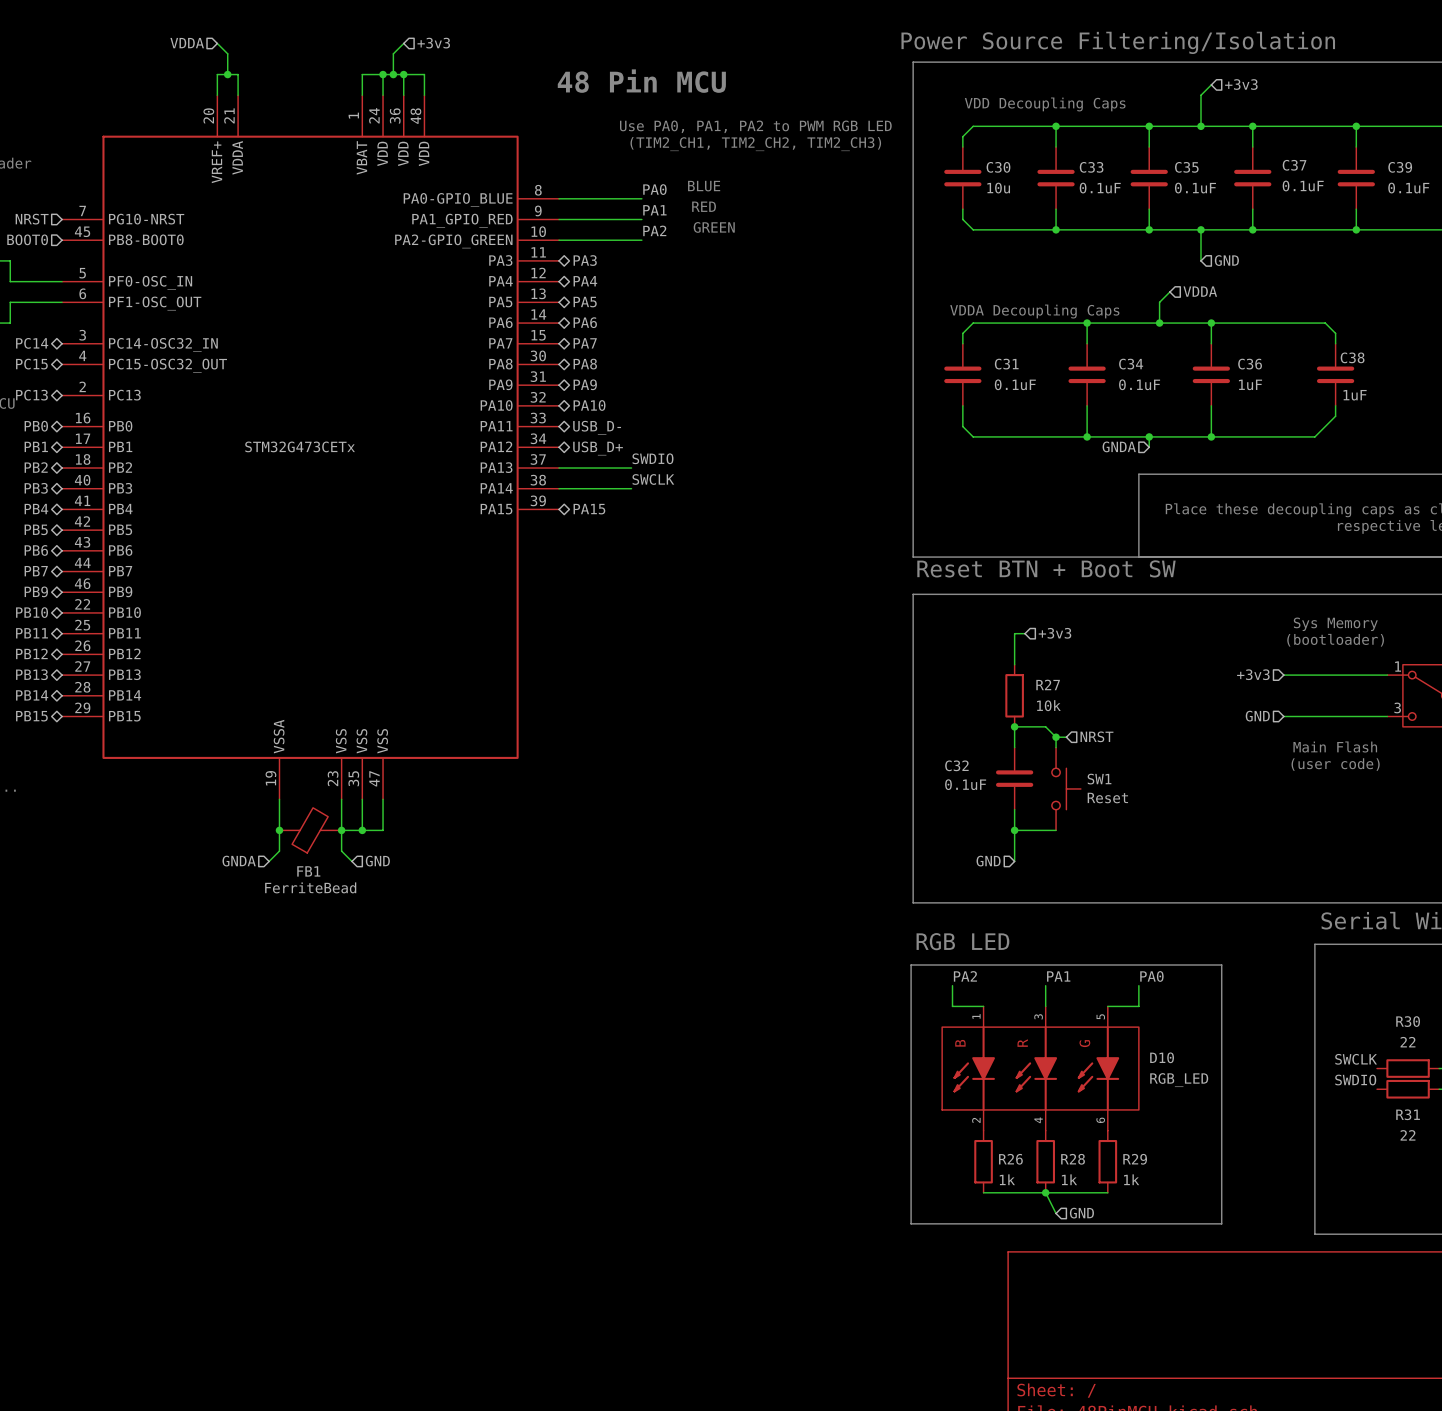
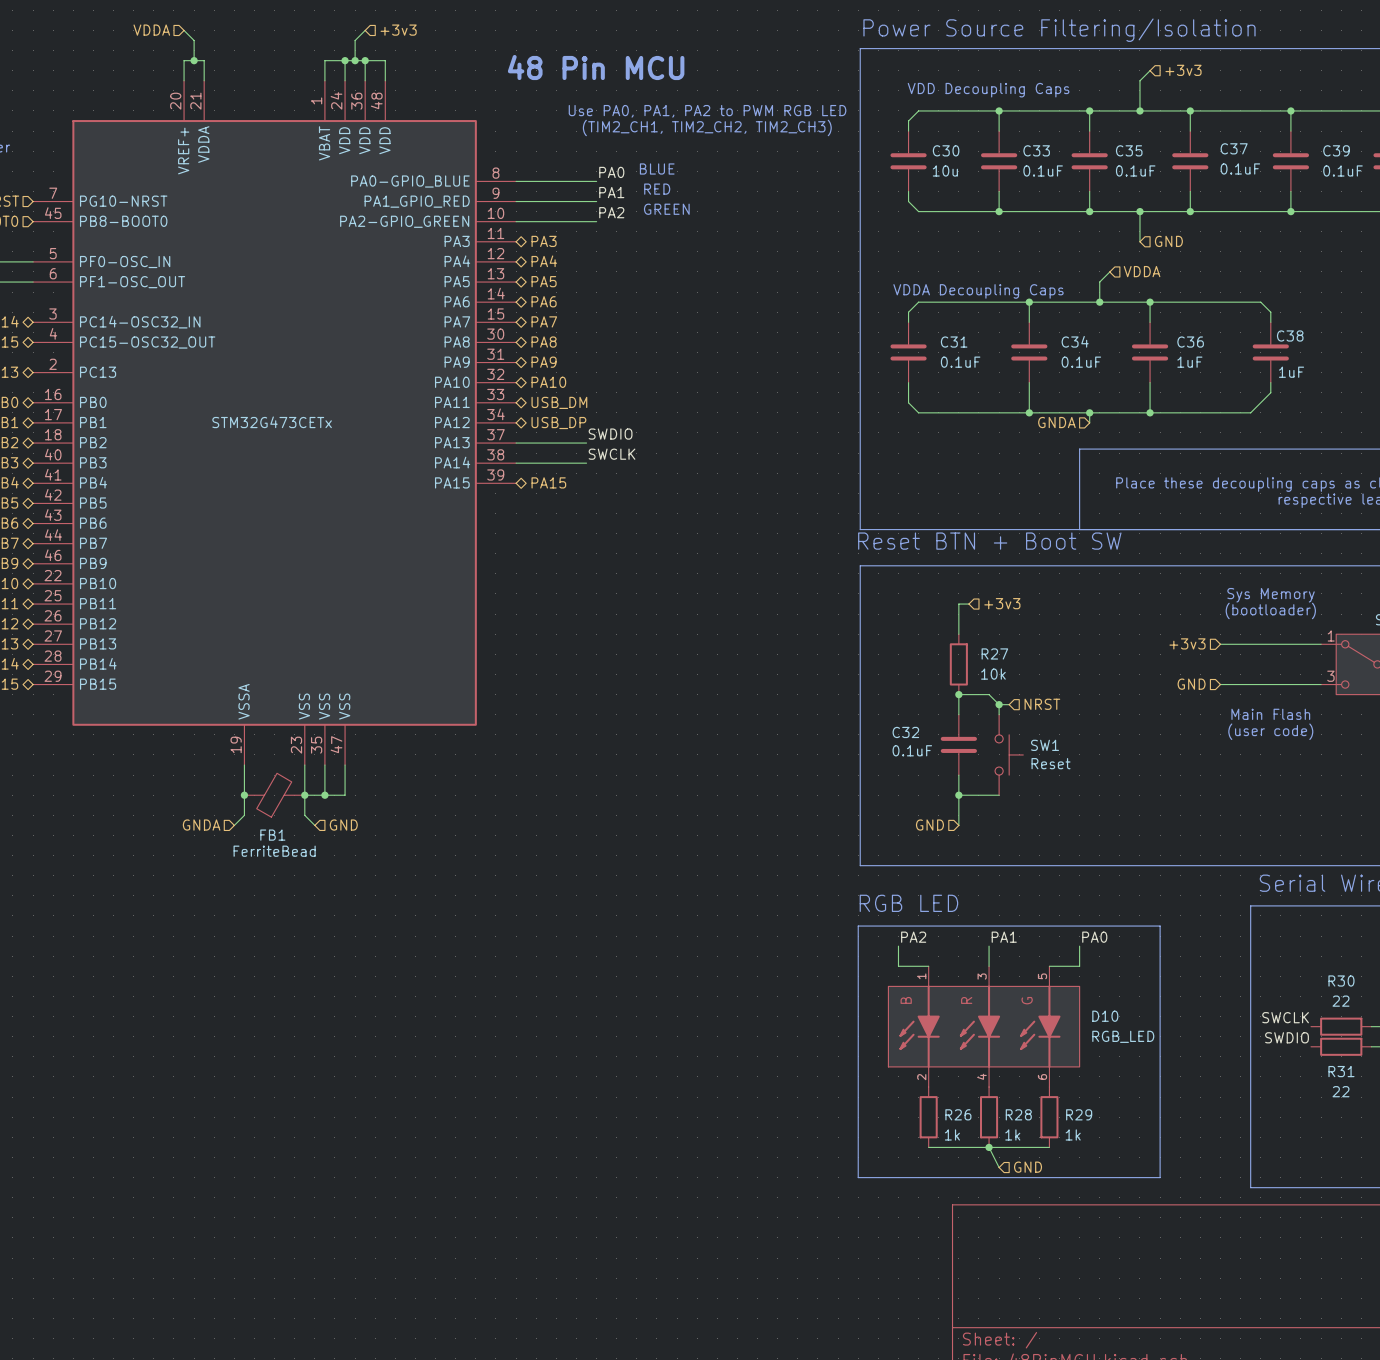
hierarchical label: USB_D- (597, 427) -> USB_DM (559, 402)
hierarchical label: USB_D+ (598, 448) -> USB_DP (558, 423)

